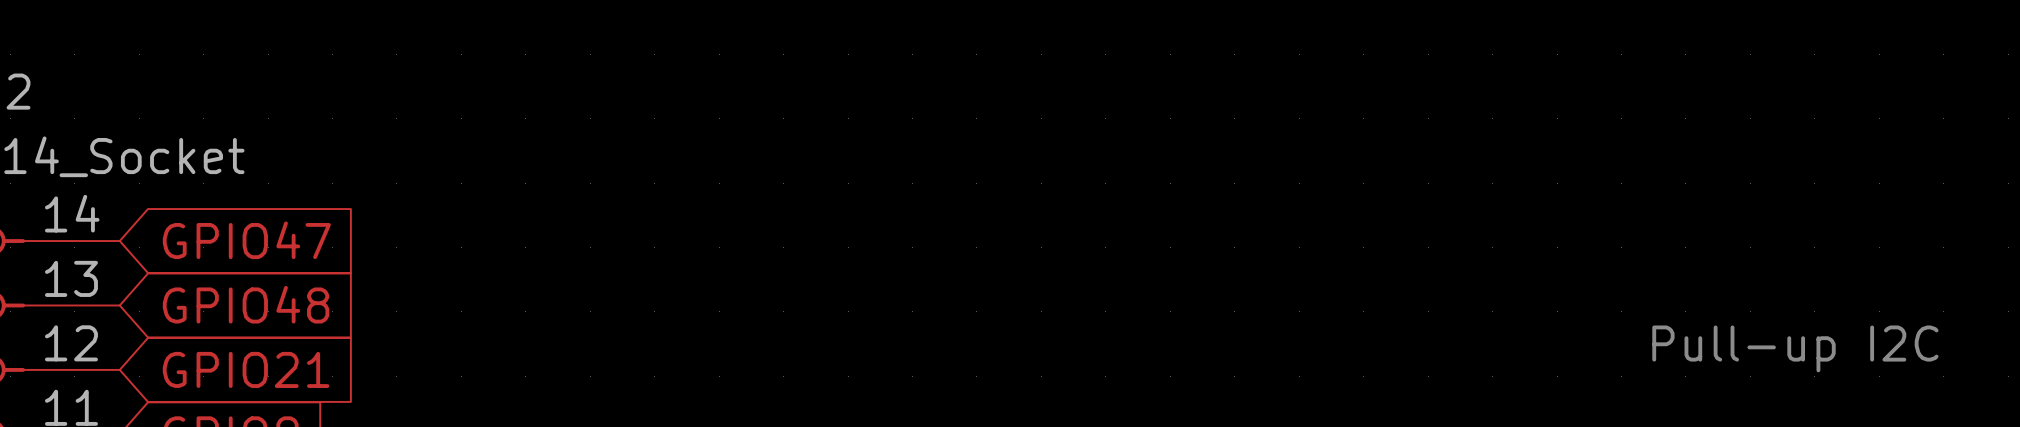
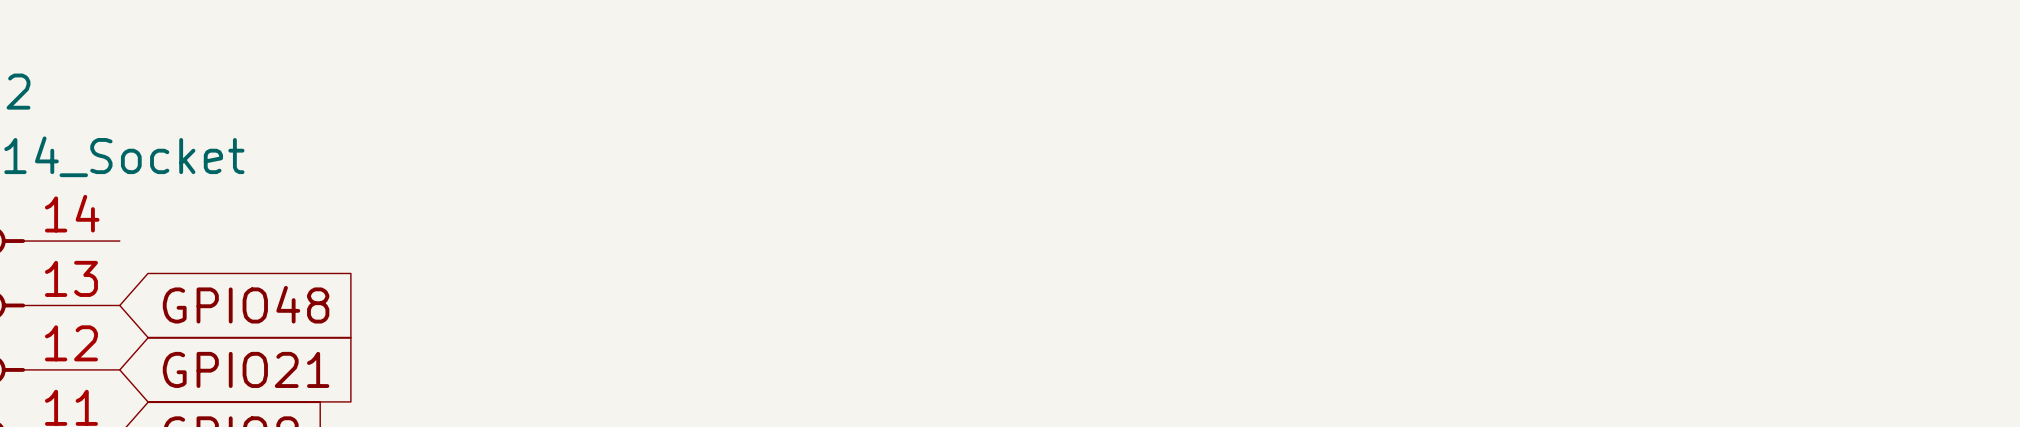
global label: GPIO47 (246, 240) -> none
text: Pull-up I2C (1795, 348) -> none

